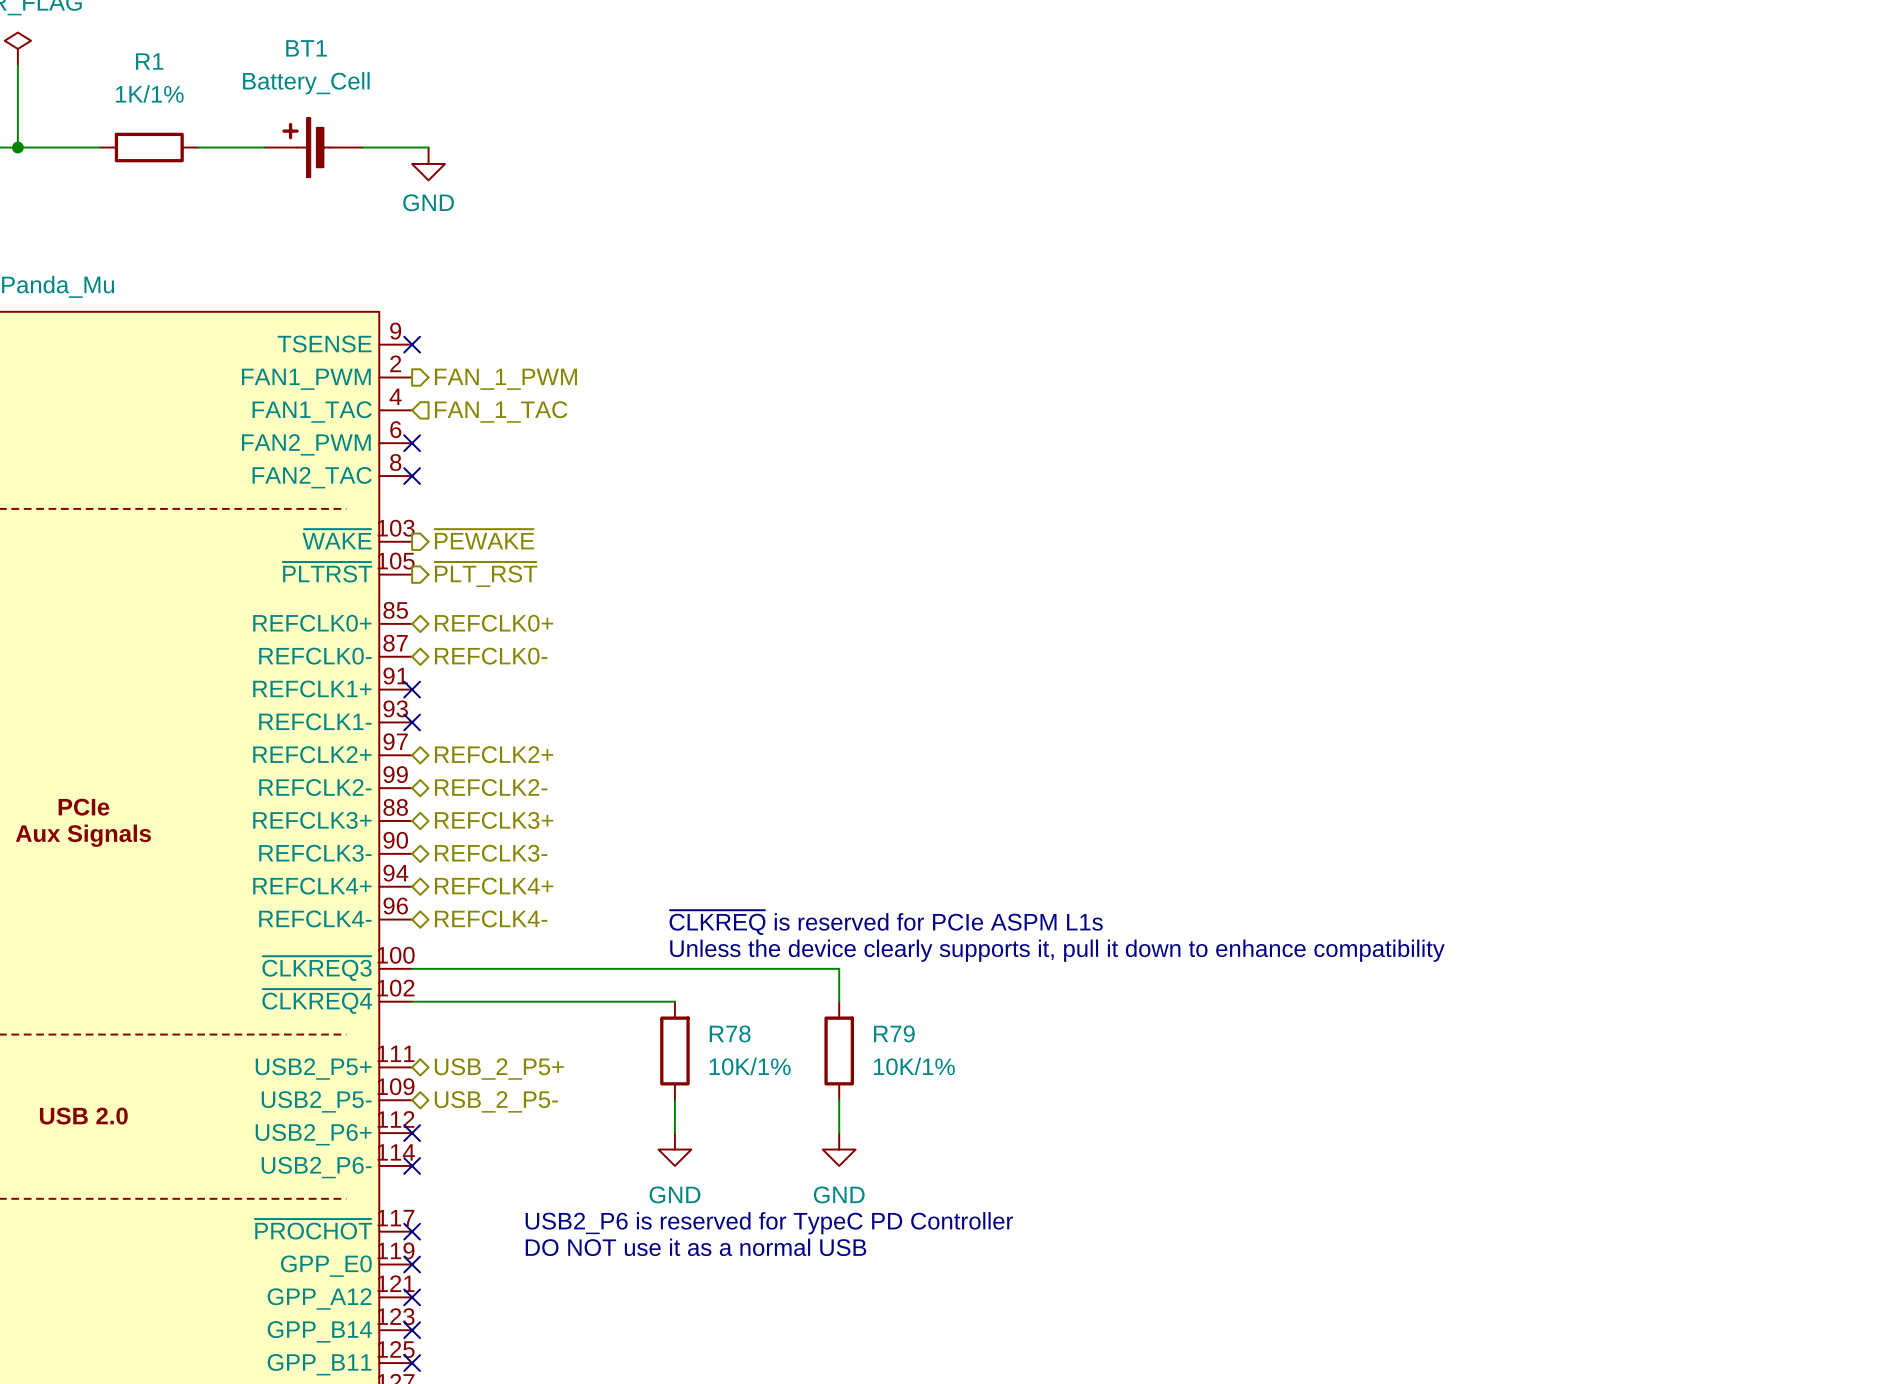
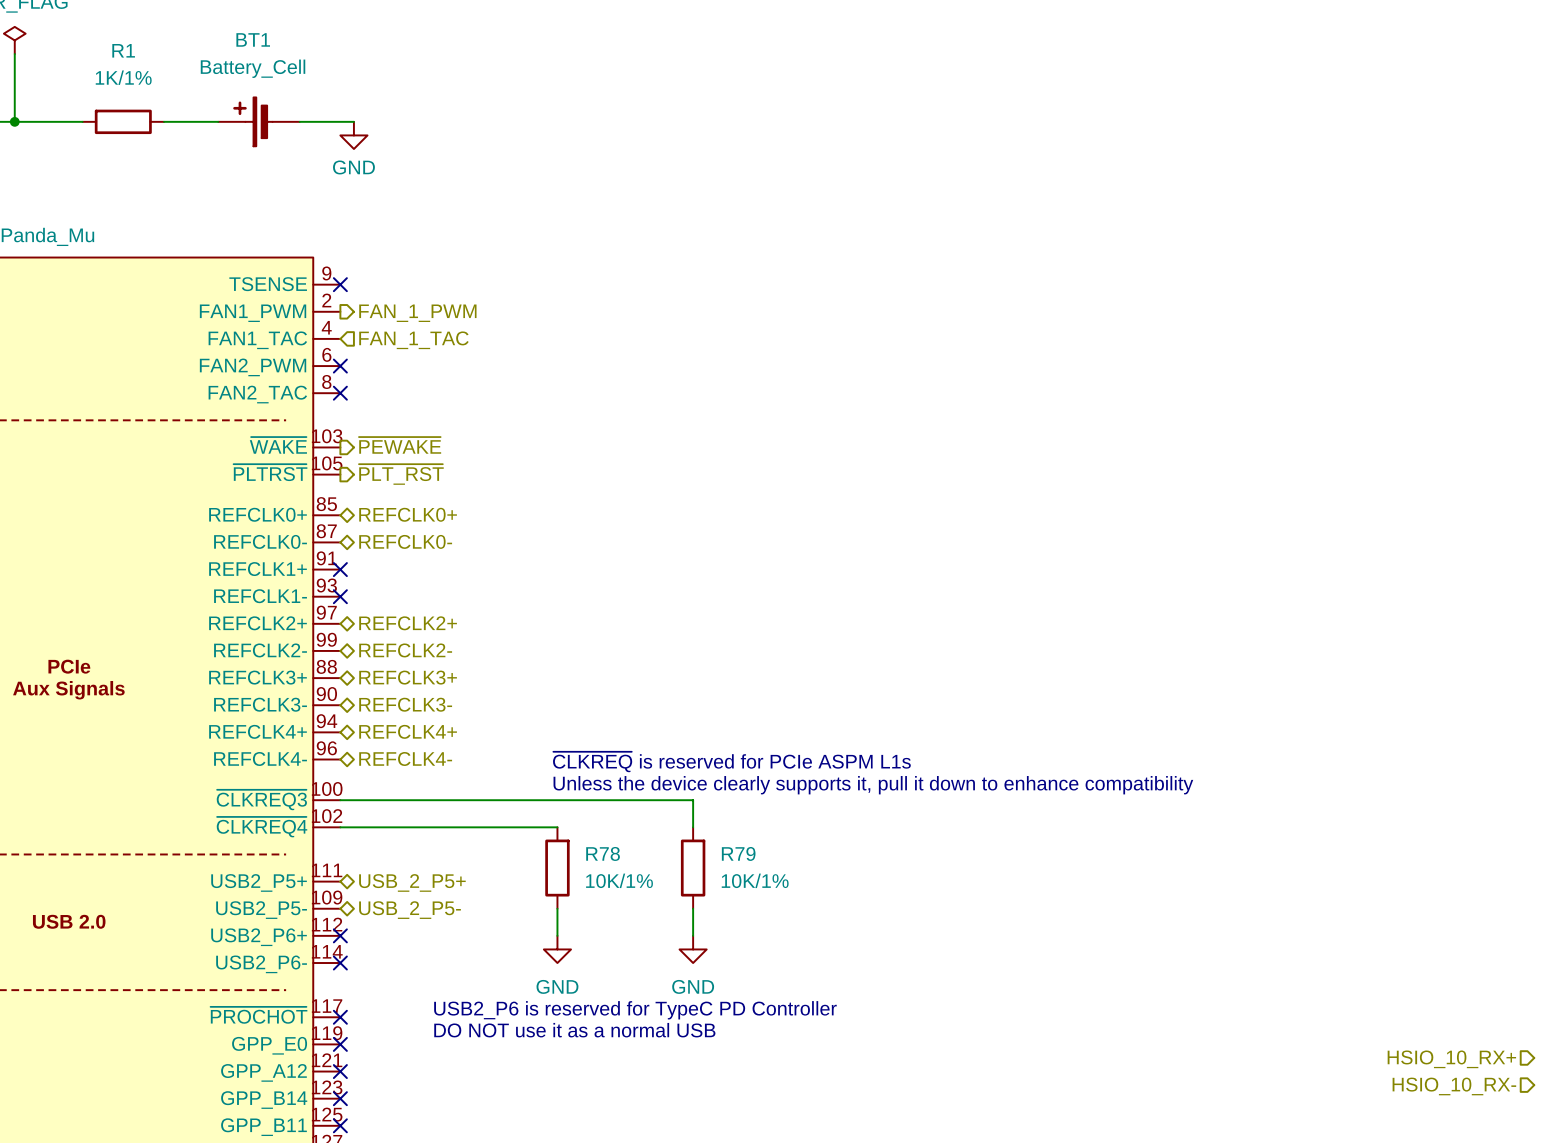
hierarchical label: none -> HSIO_10_RX+ (1451, 1059)
hierarchical label: none -> HSIO_10_RX- (1454, 1086)

